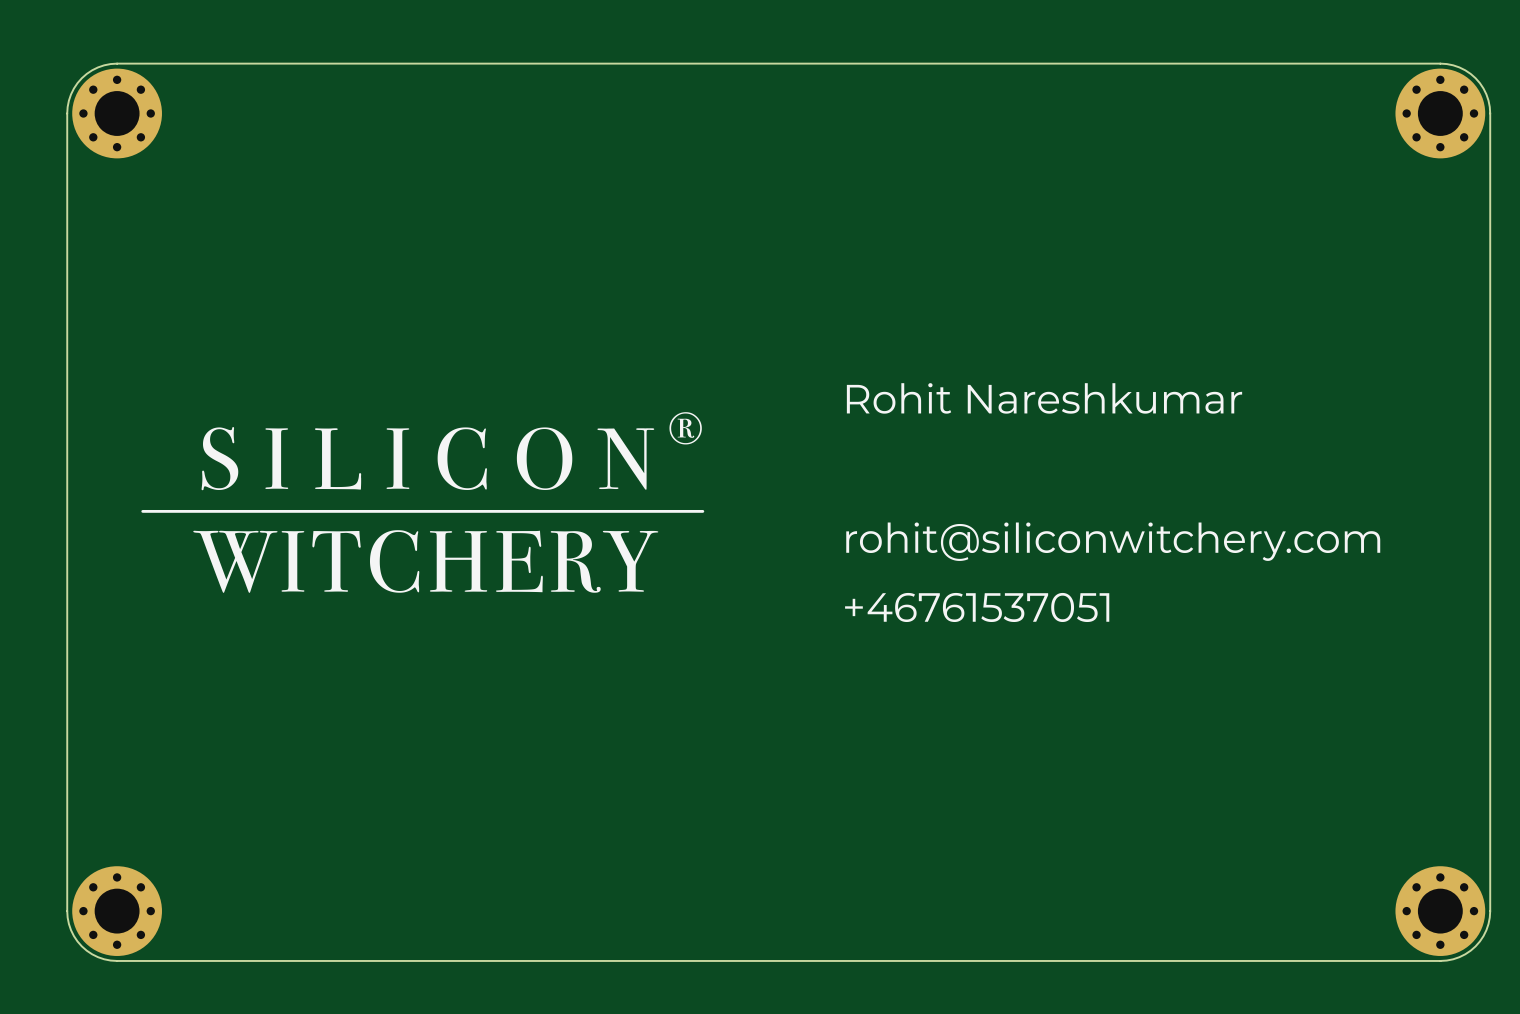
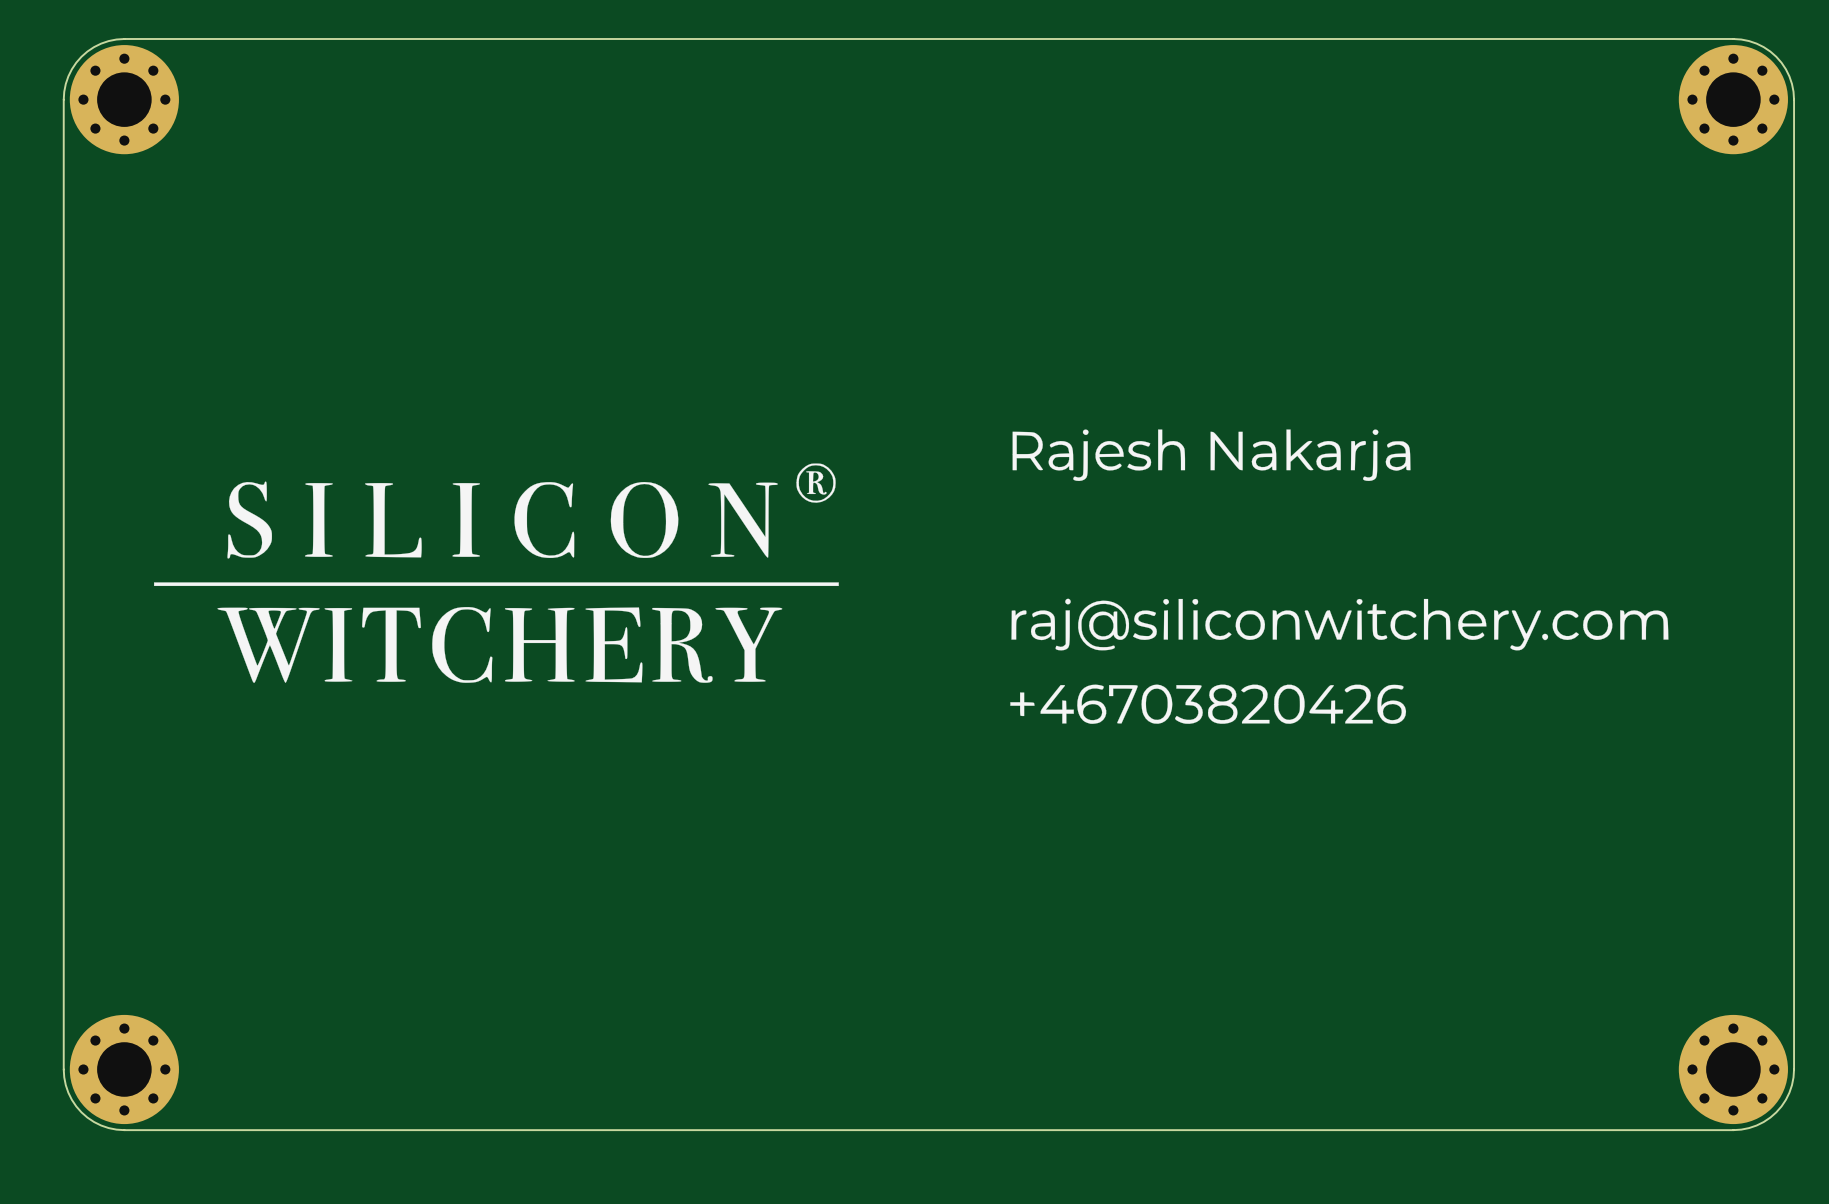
drawing: [846, 383, 1243, 414] -> none
drawing: none -> [154, 429, 1669, 724]
drawing: [597, 412, 702, 490] -> none
drawing: [201, 427, 239, 491] -> none
drawing: [437, 427, 487, 491] -> none
drawing: [516, 427, 573, 491] -> none
drawing: [265, 428, 289, 489] -> none
drawing: [315, 428, 362, 490] -> none
drawing: [386, 428, 410, 489] -> none
line: (702, 511) (142, 511) -> none
drawing: [846, 522, 1381, 561] -> none
drawing: [193, 530, 659, 593] -> none
drawing: [845, 592, 1110, 623] -> none

